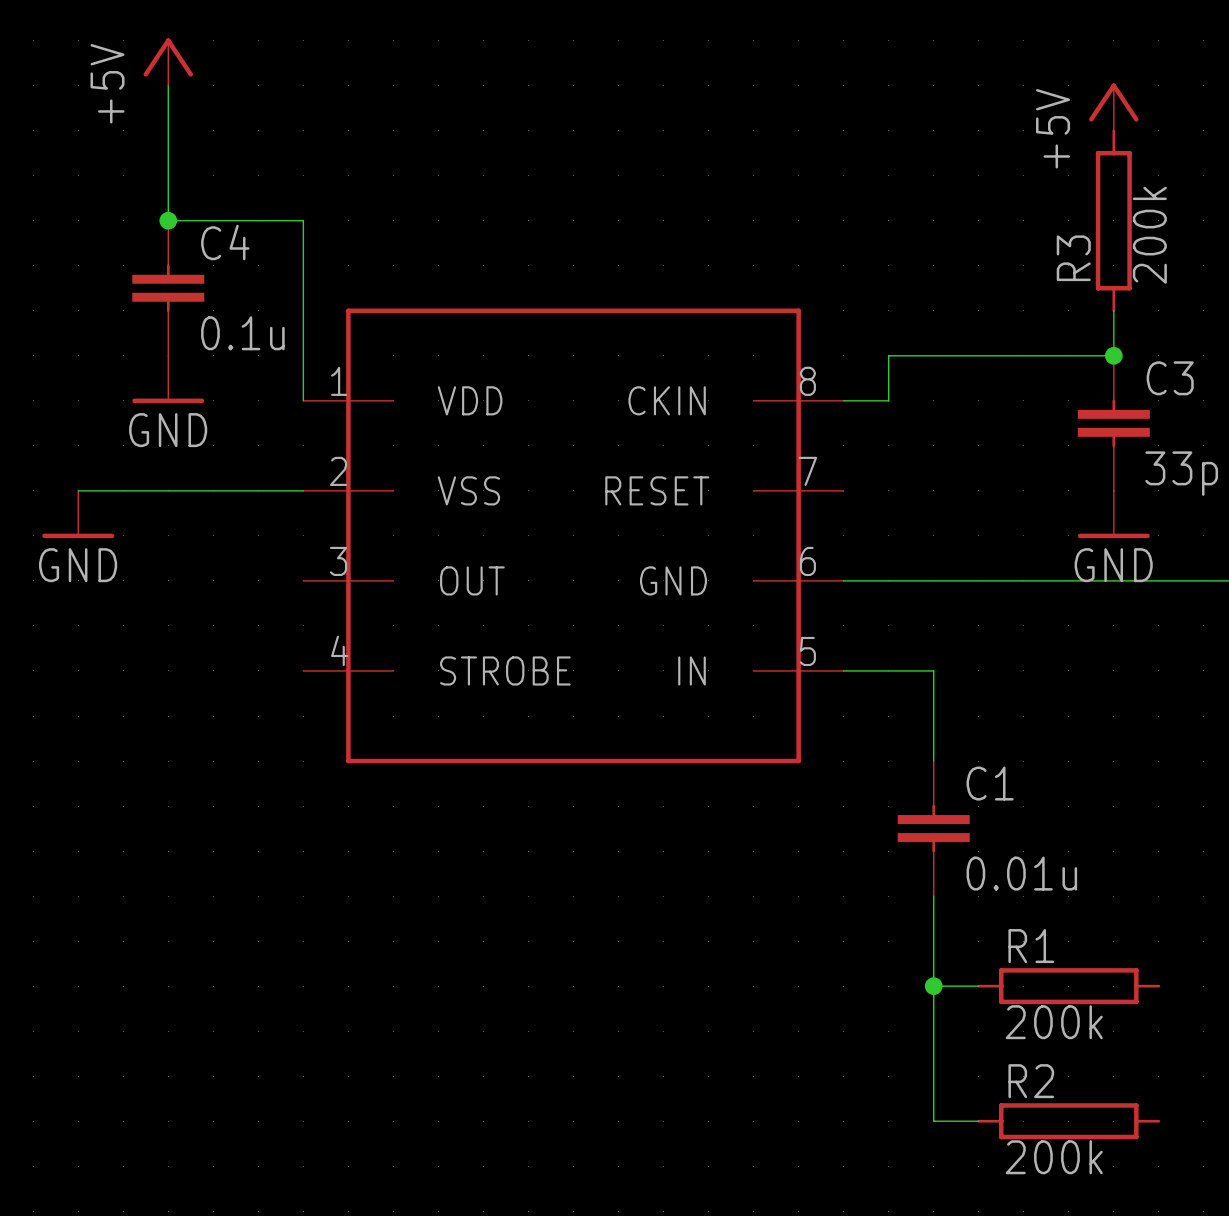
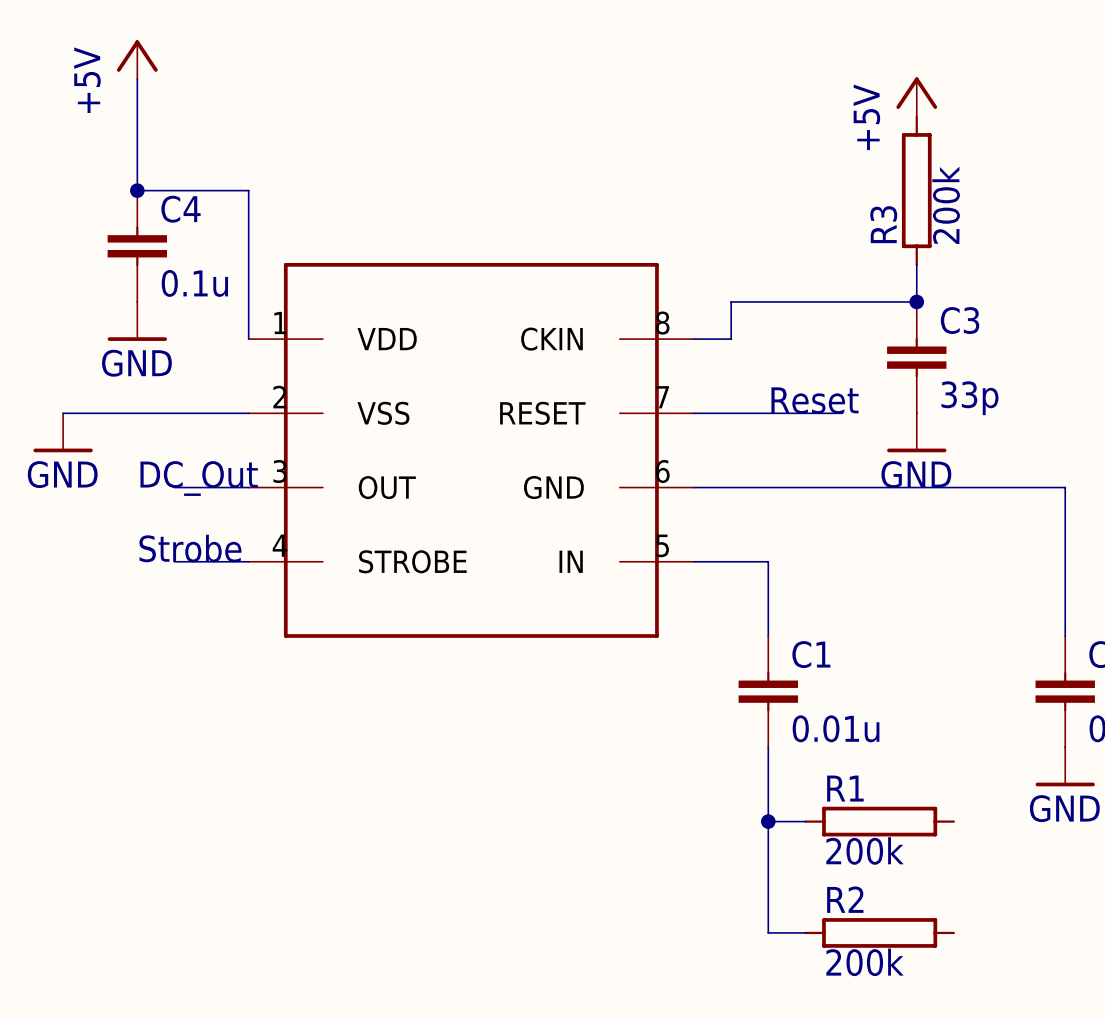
text: none -> Reset (815, 400)
wire: none -> (694, 413) (842, 413)
text: none -> DC_Out (199, 478)
wire: none -> (174, 487) (248, 487)
text: none -> Strobe (190, 548)
wire: none -> (174, 561) (248, 561)

